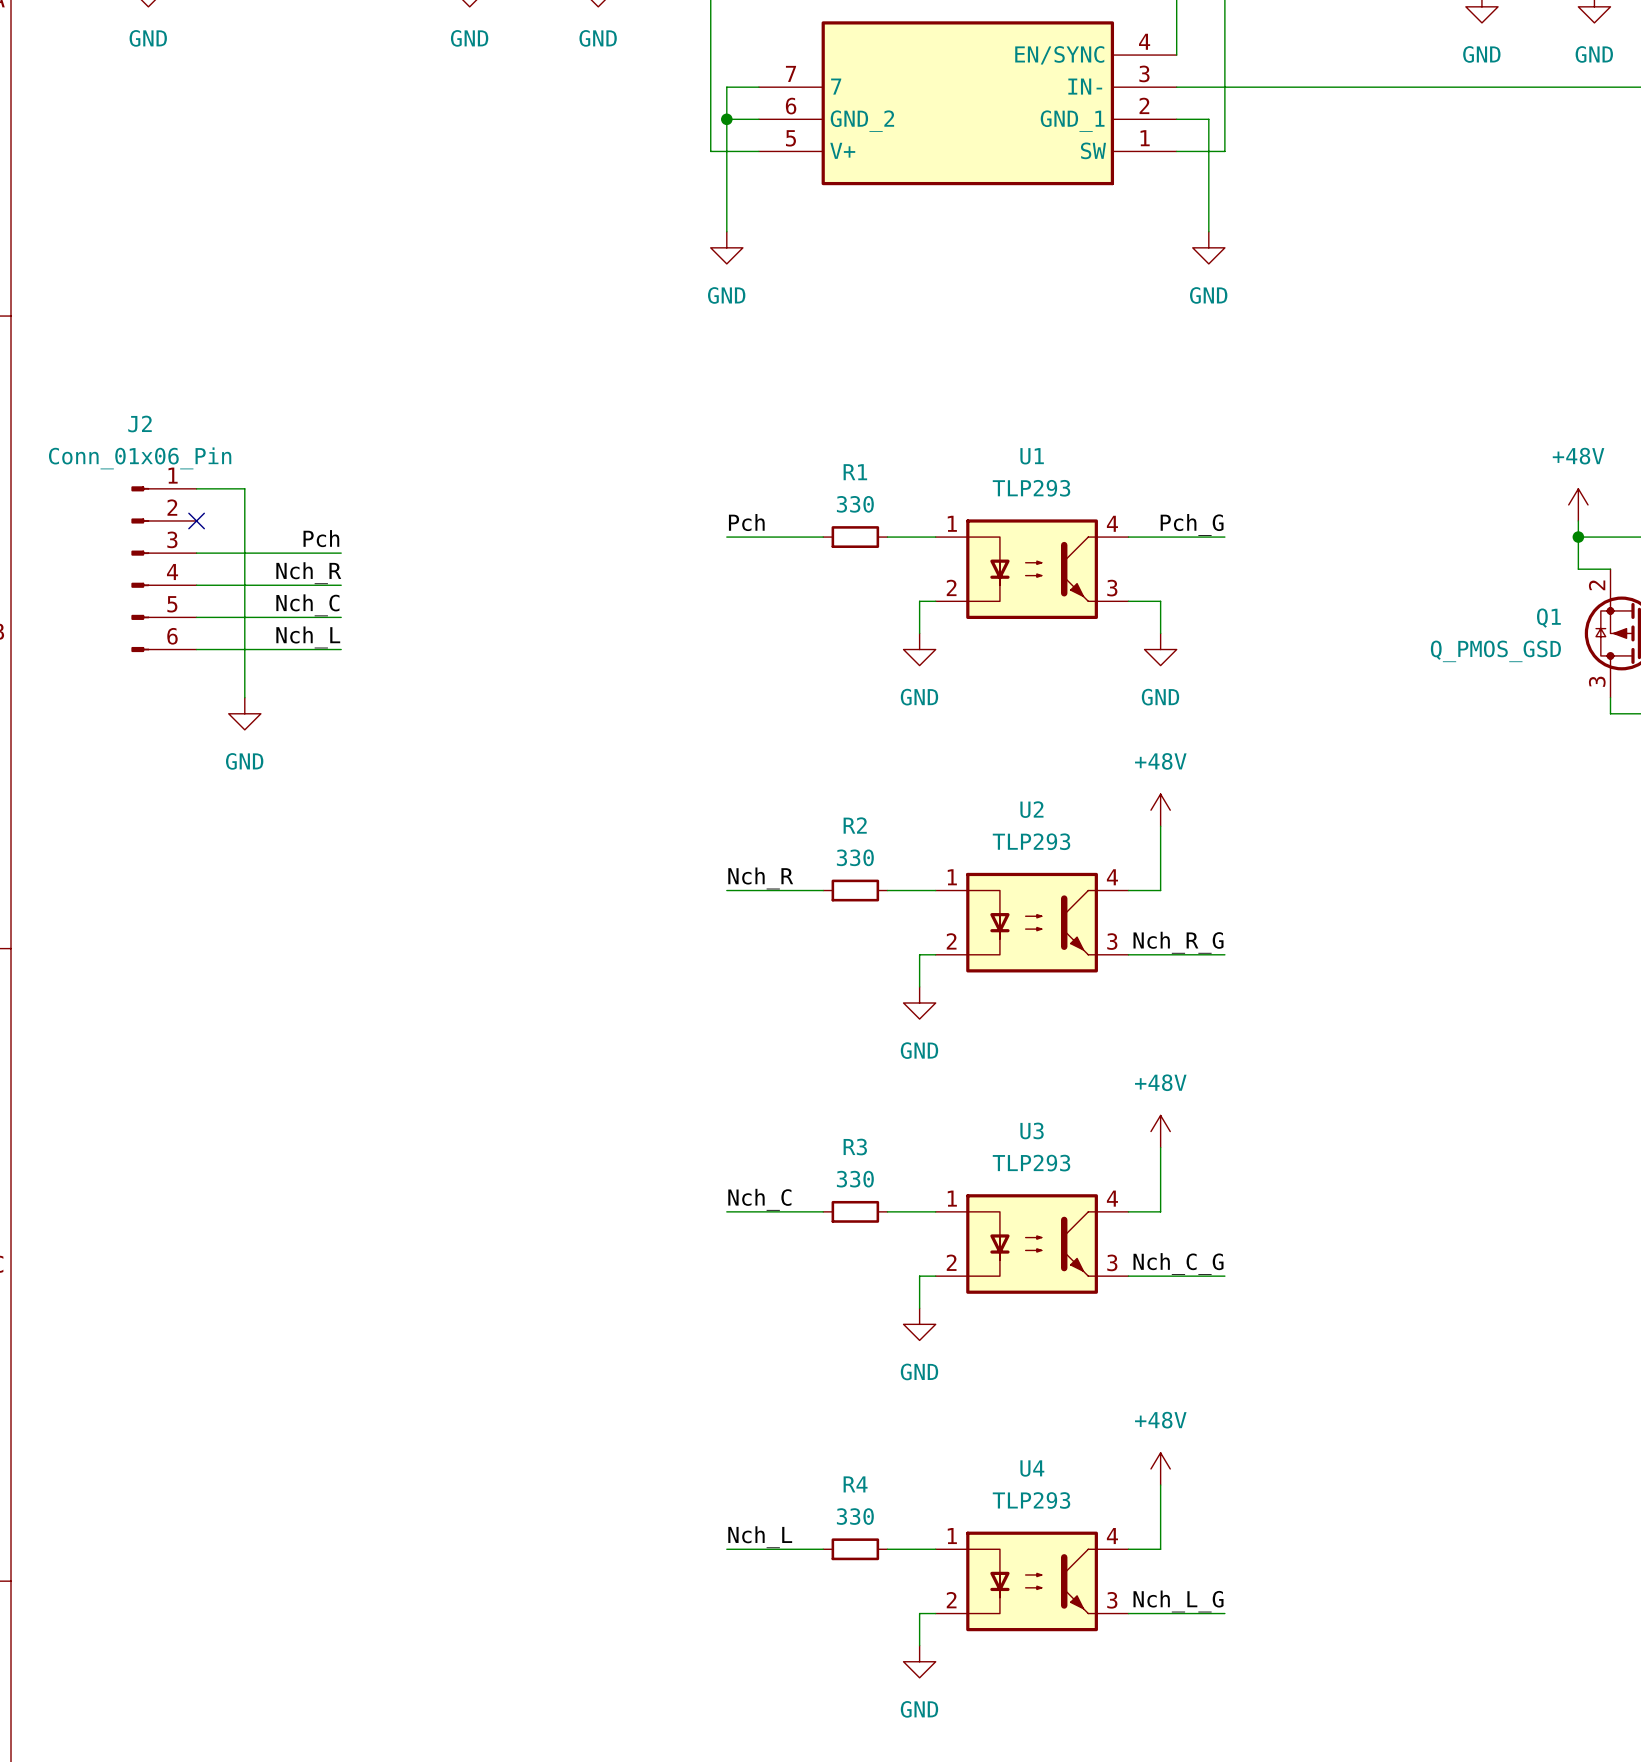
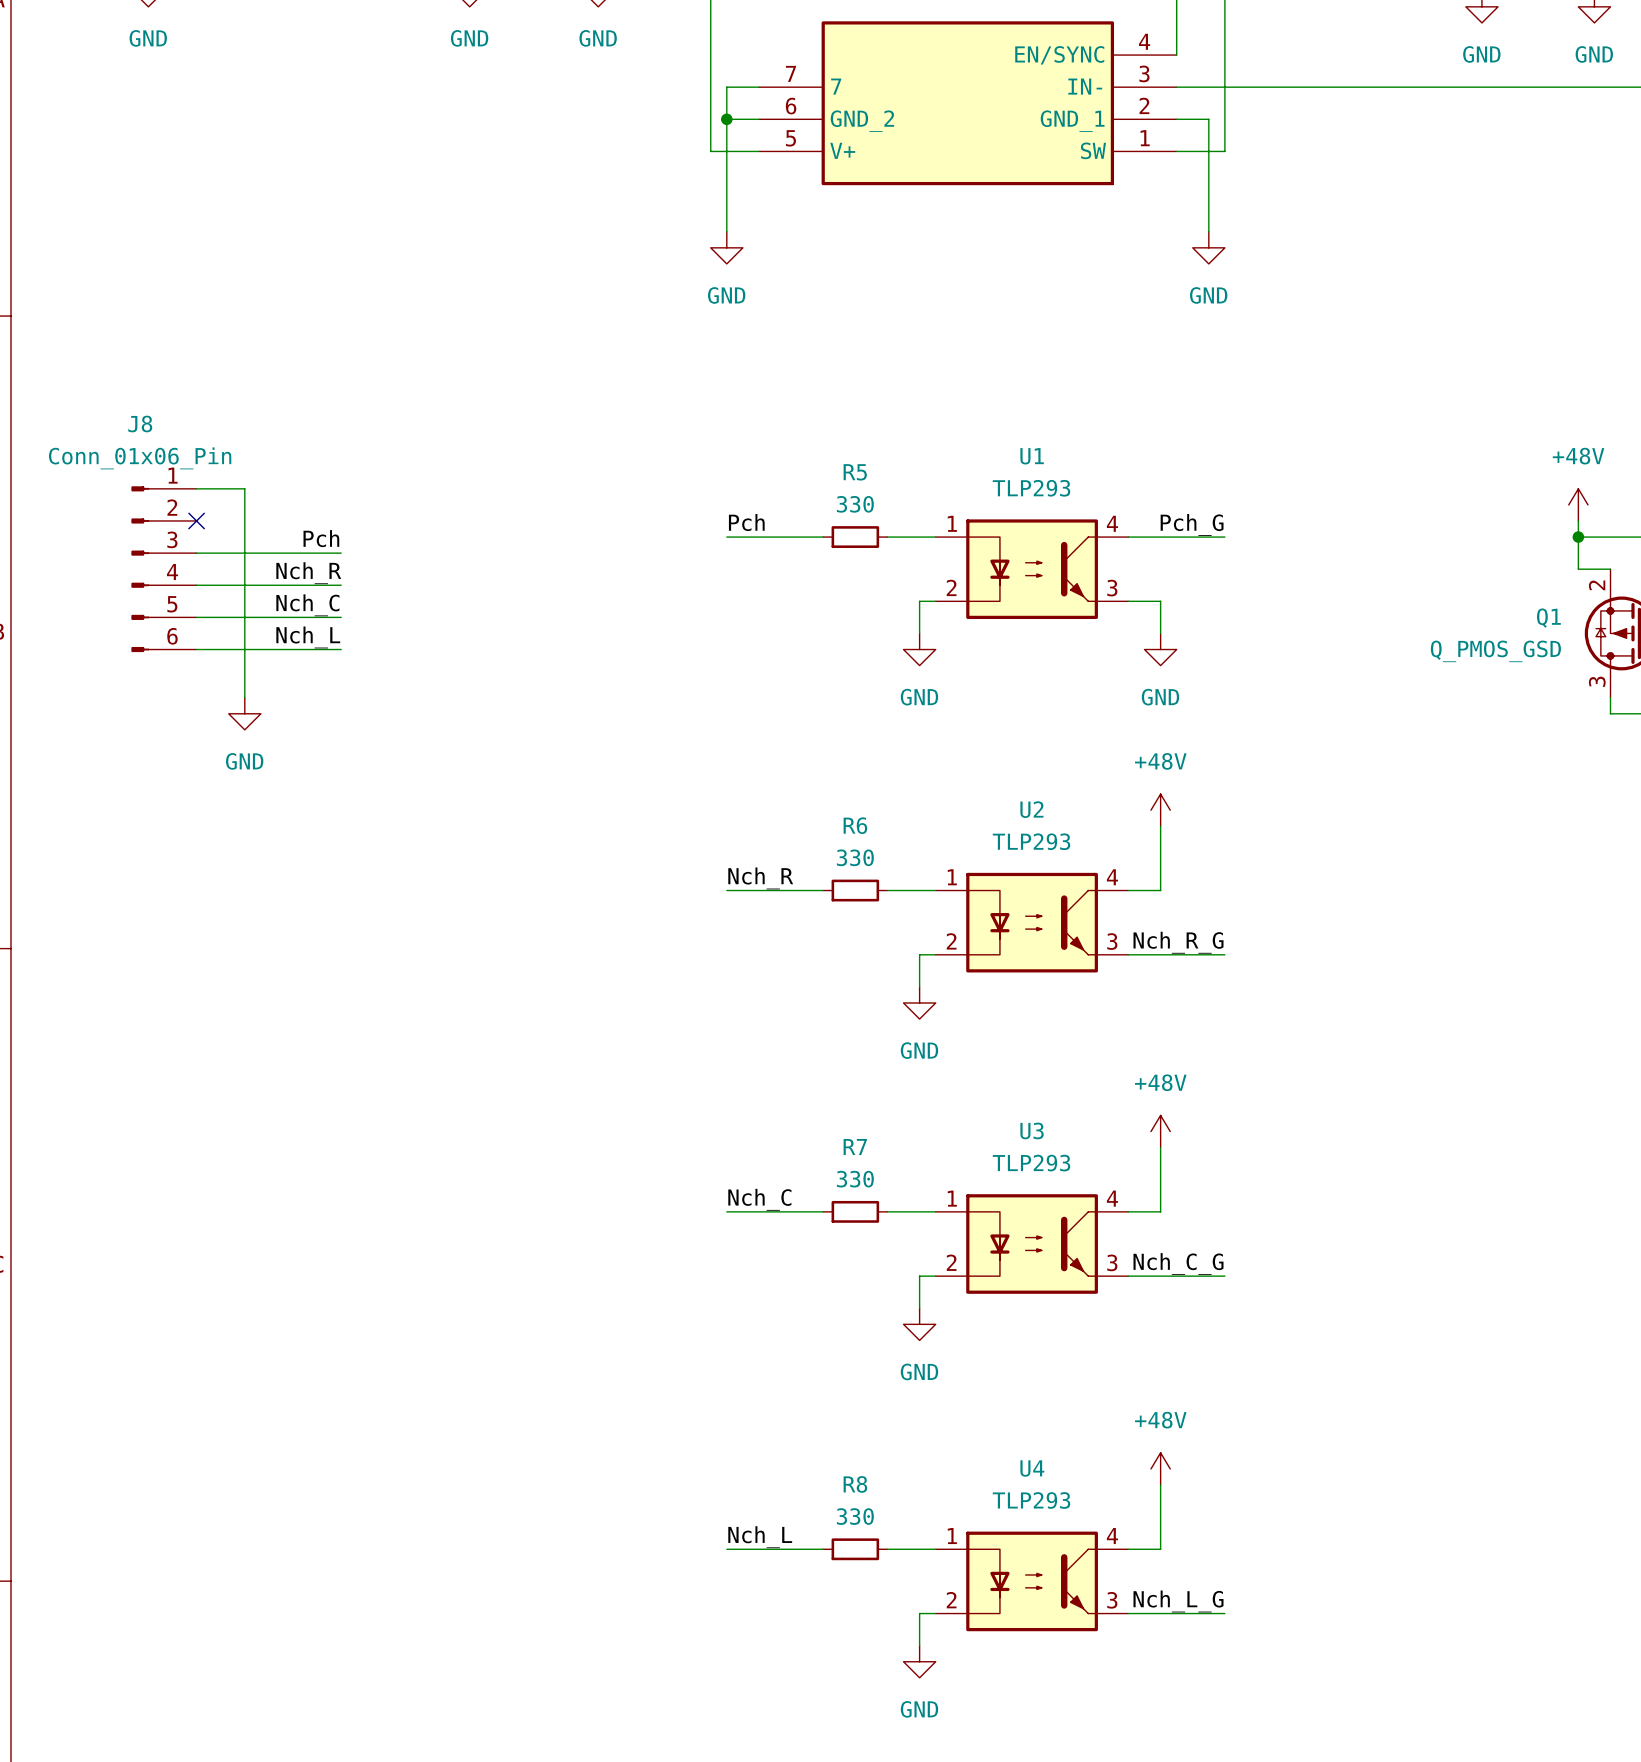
J2 name: J2 (140, 424) -> J8 (140, 424)
R1 name: R1 (855, 472) -> R5 (855, 472)
R2 name: R2 (855, 825) -> R6 (855, 825)
R3 name: R3 (855, 1147) -> R7 (855, 1147)
R4 name: R4 (855, 1484) -> R8 (855, 1484)

